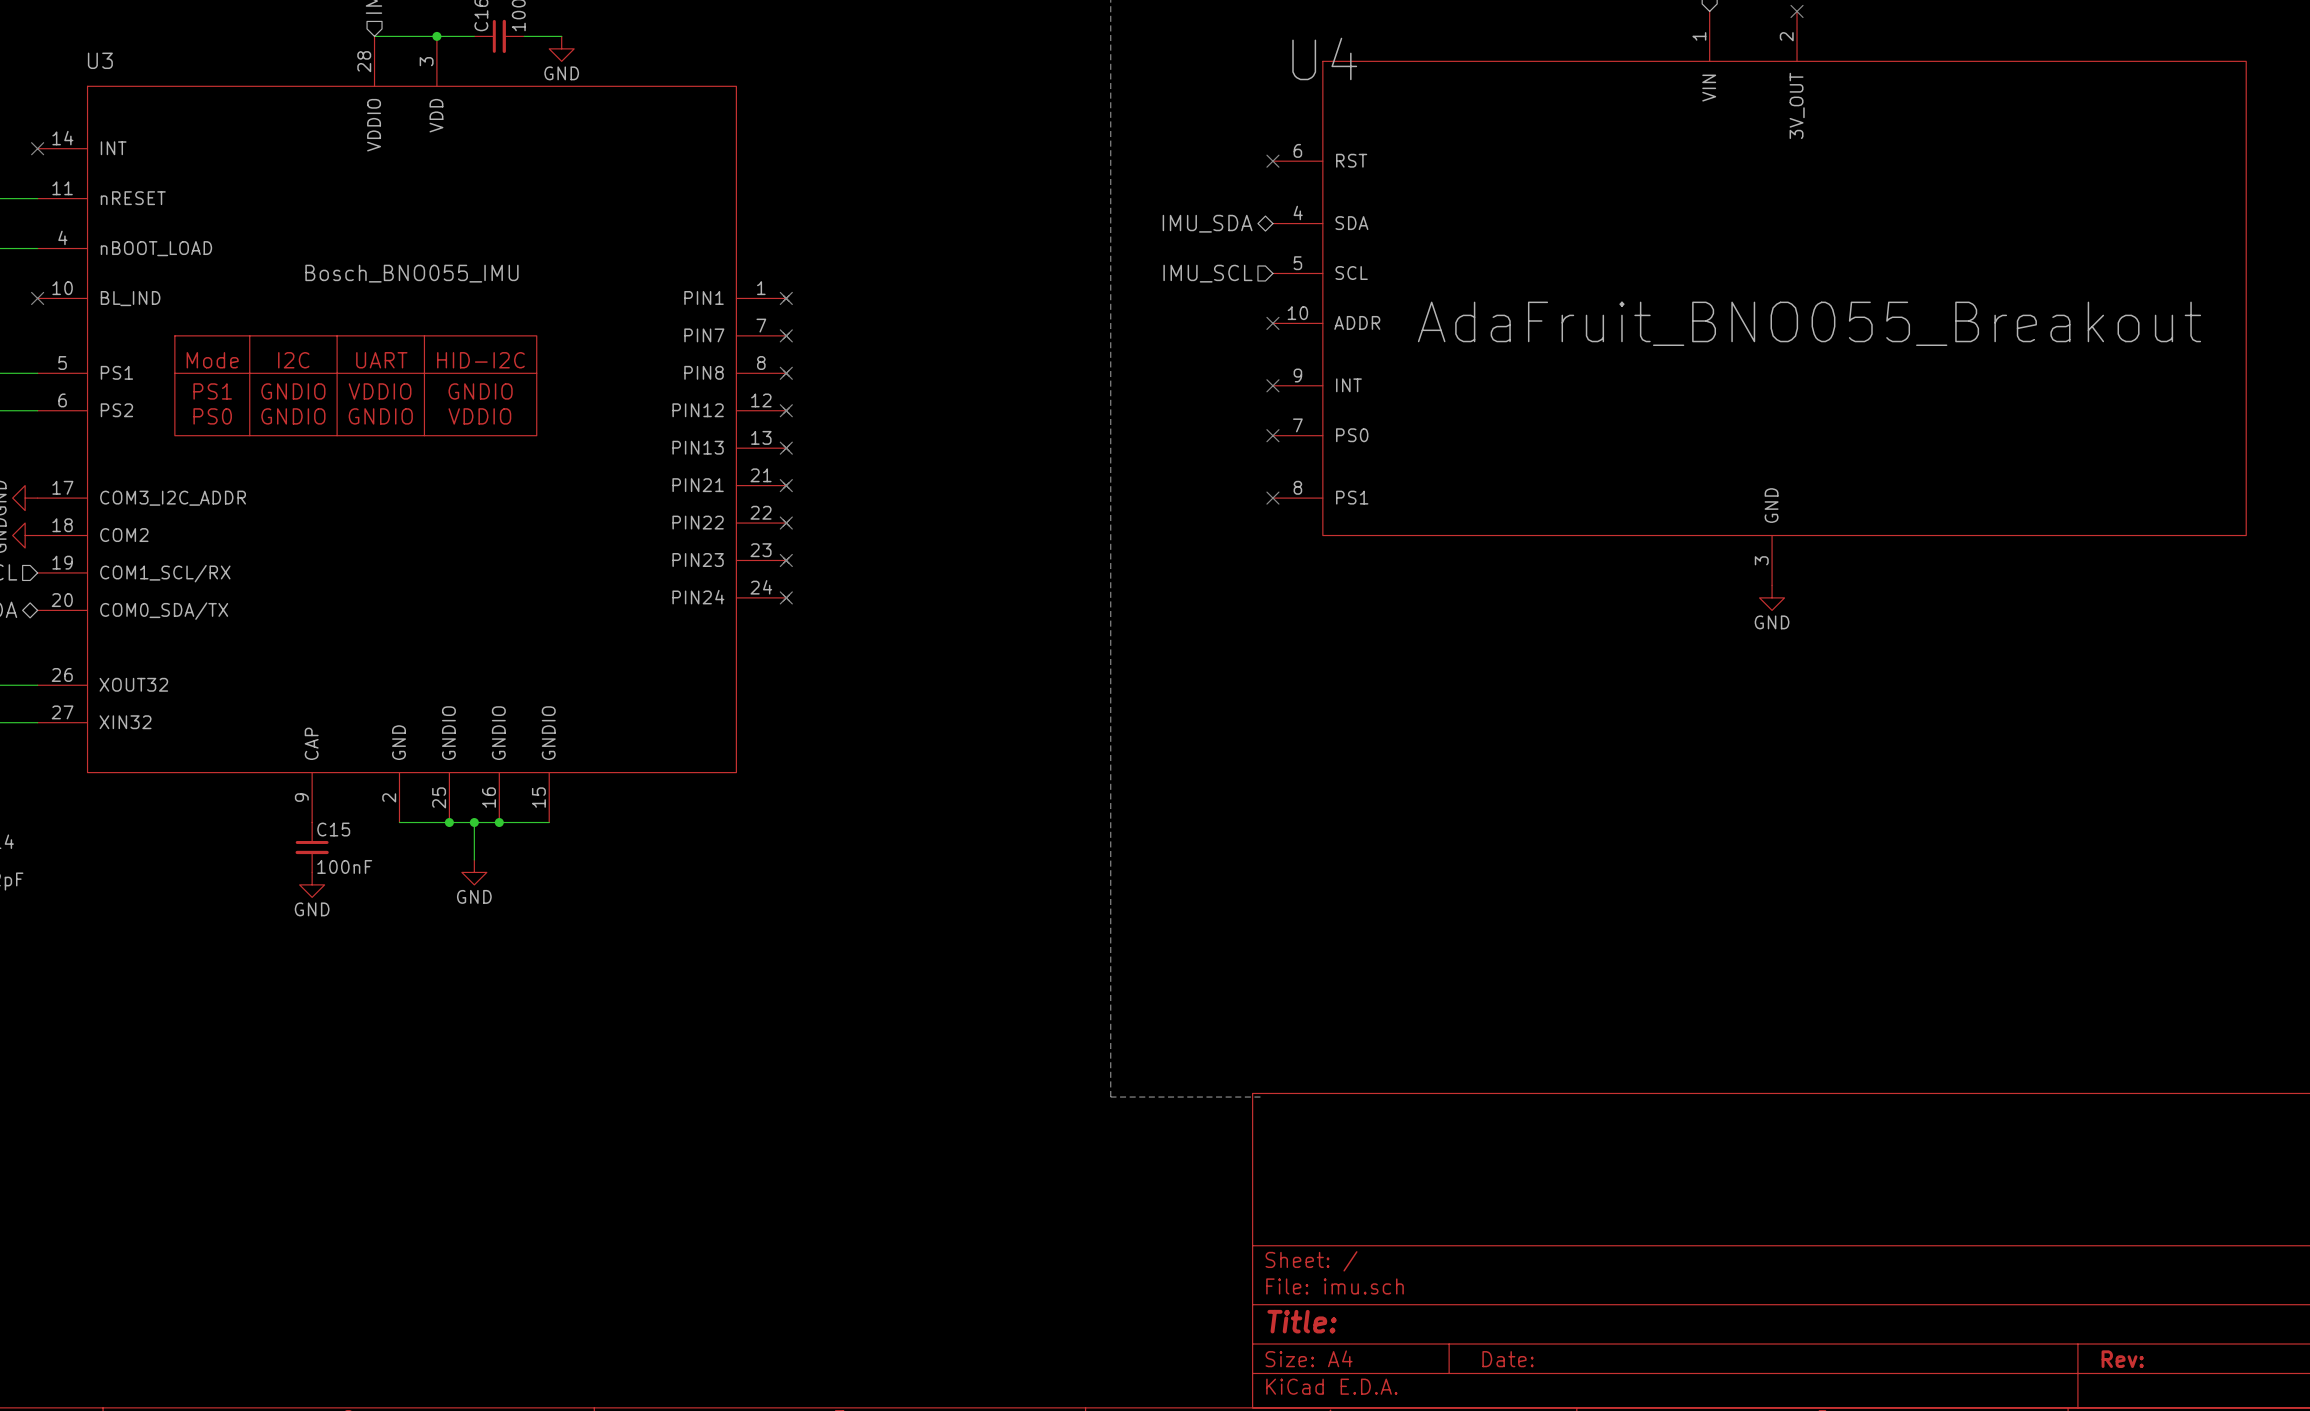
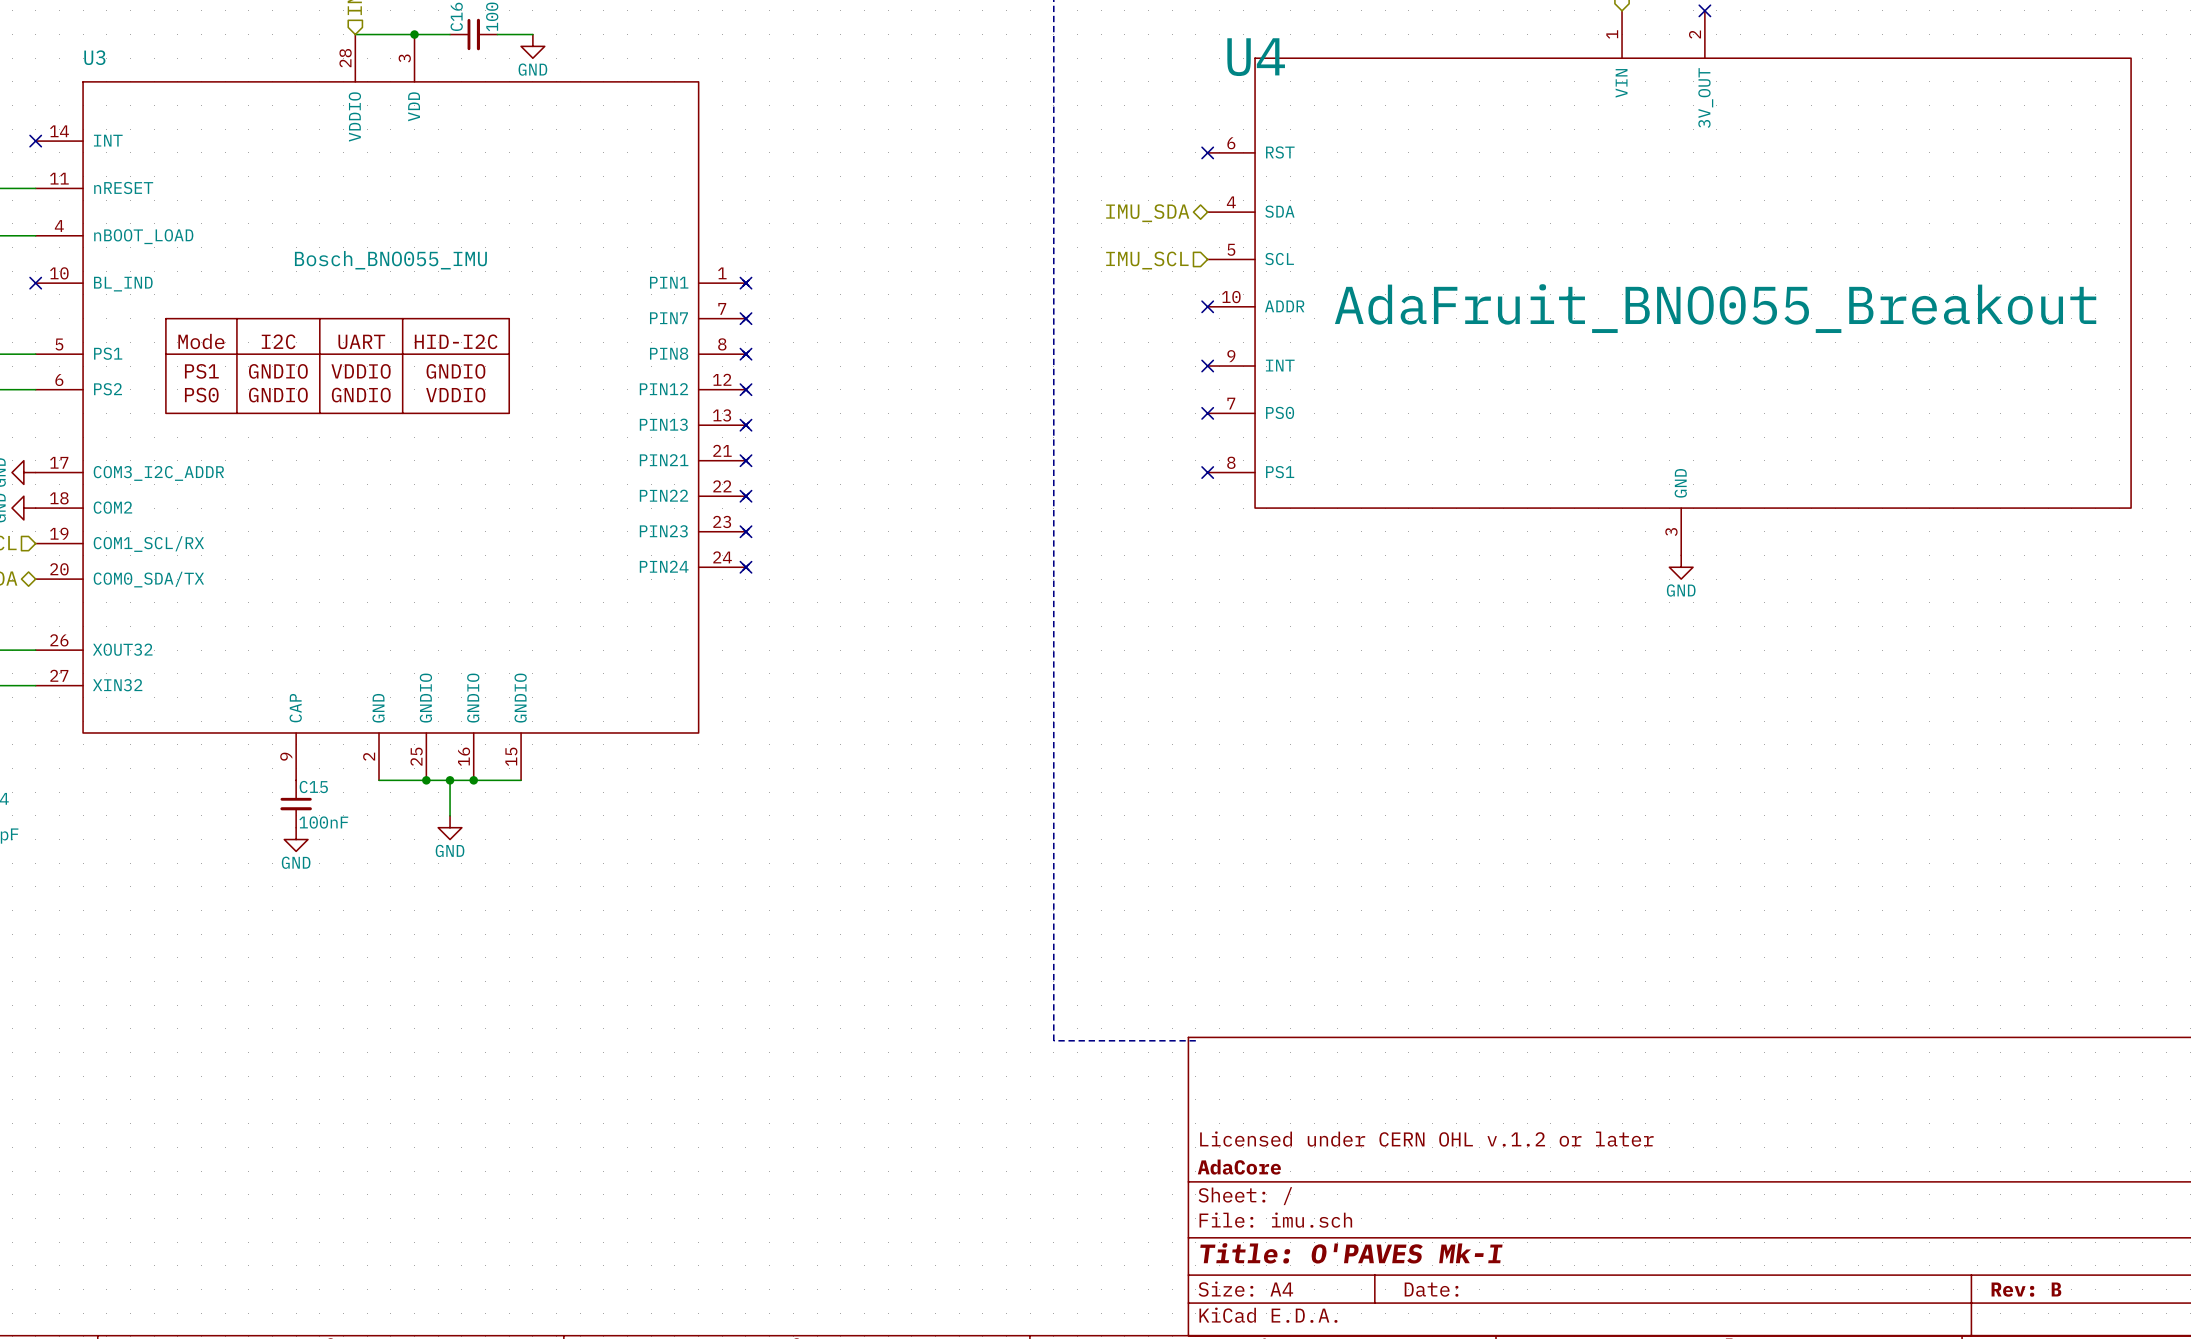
title block: none -> Licensed under CERN OHL v.1.2 or later (1426, 1139)
title block: none -> AdaCore (1239, 1167)
title block: Title: (1302, 1321) -> Title: O'PAVES Mk-I (1351, 1253)
title block: Rev: (2122, 1359) -> Rev: B (2026, 1289)

